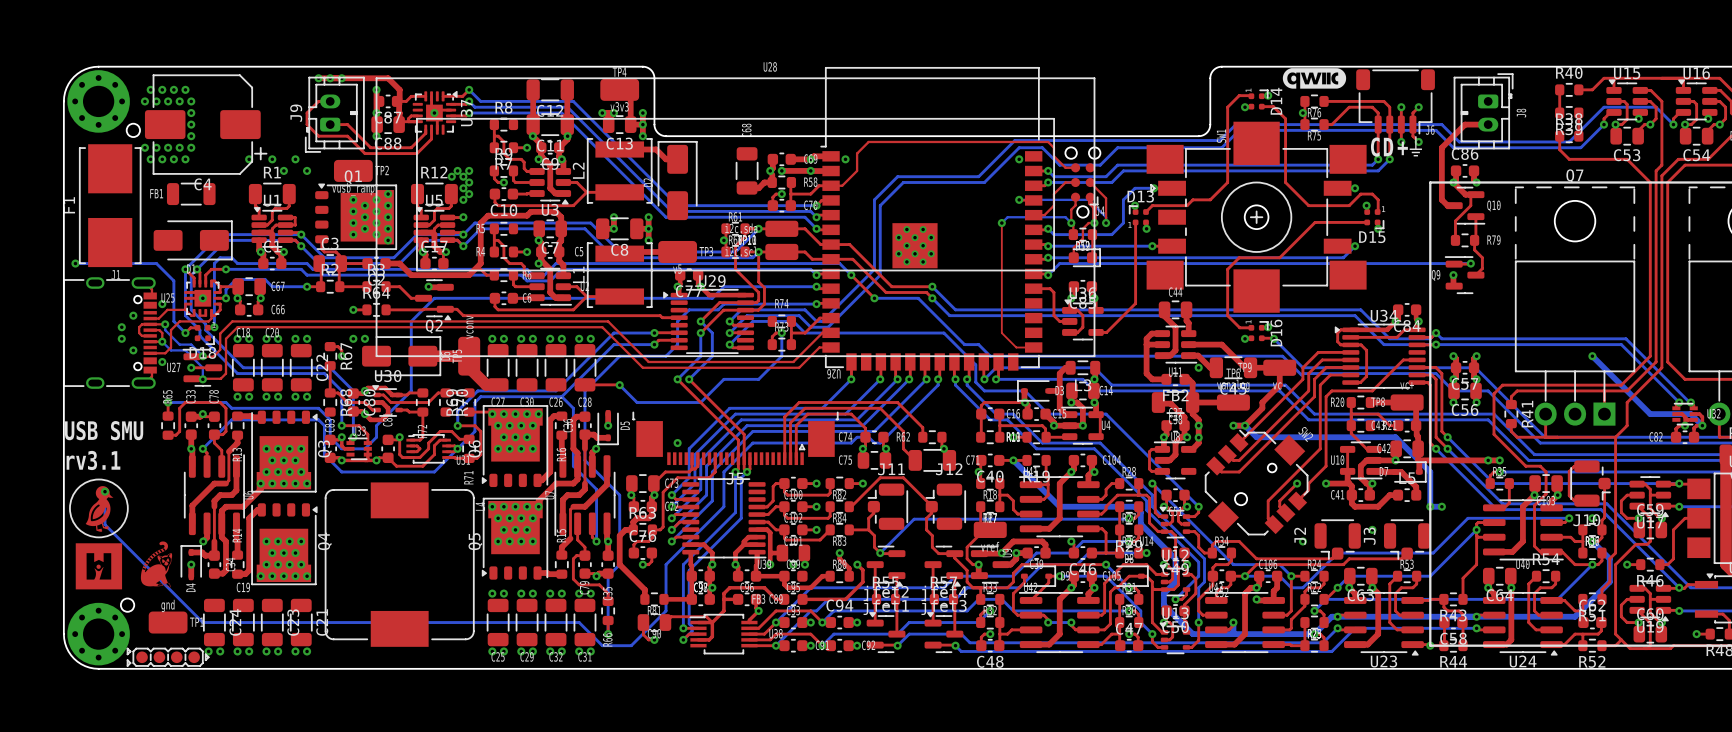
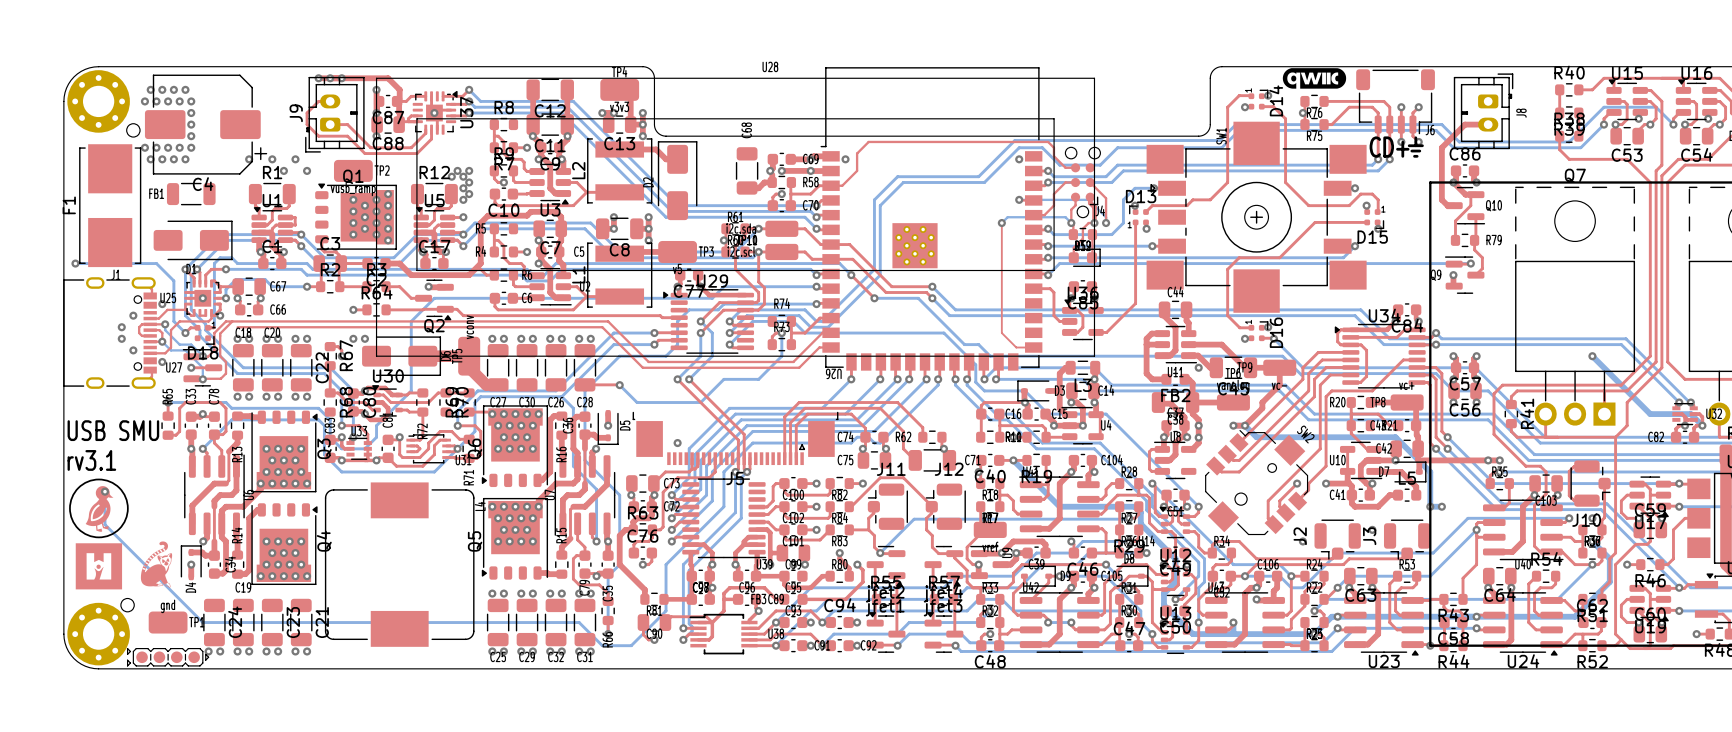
top track: none -> (232, 321) (226, 321) (214, 333) (214, 350) (208, 356)
via position: (214, 327) -> (220, 315)
top track: (237, 327) (226, 338) (226, 361) -> none
top track: (220, 349) (213, 356) (208, 356) -> (220, 349) (220, 356) (226, 361)

